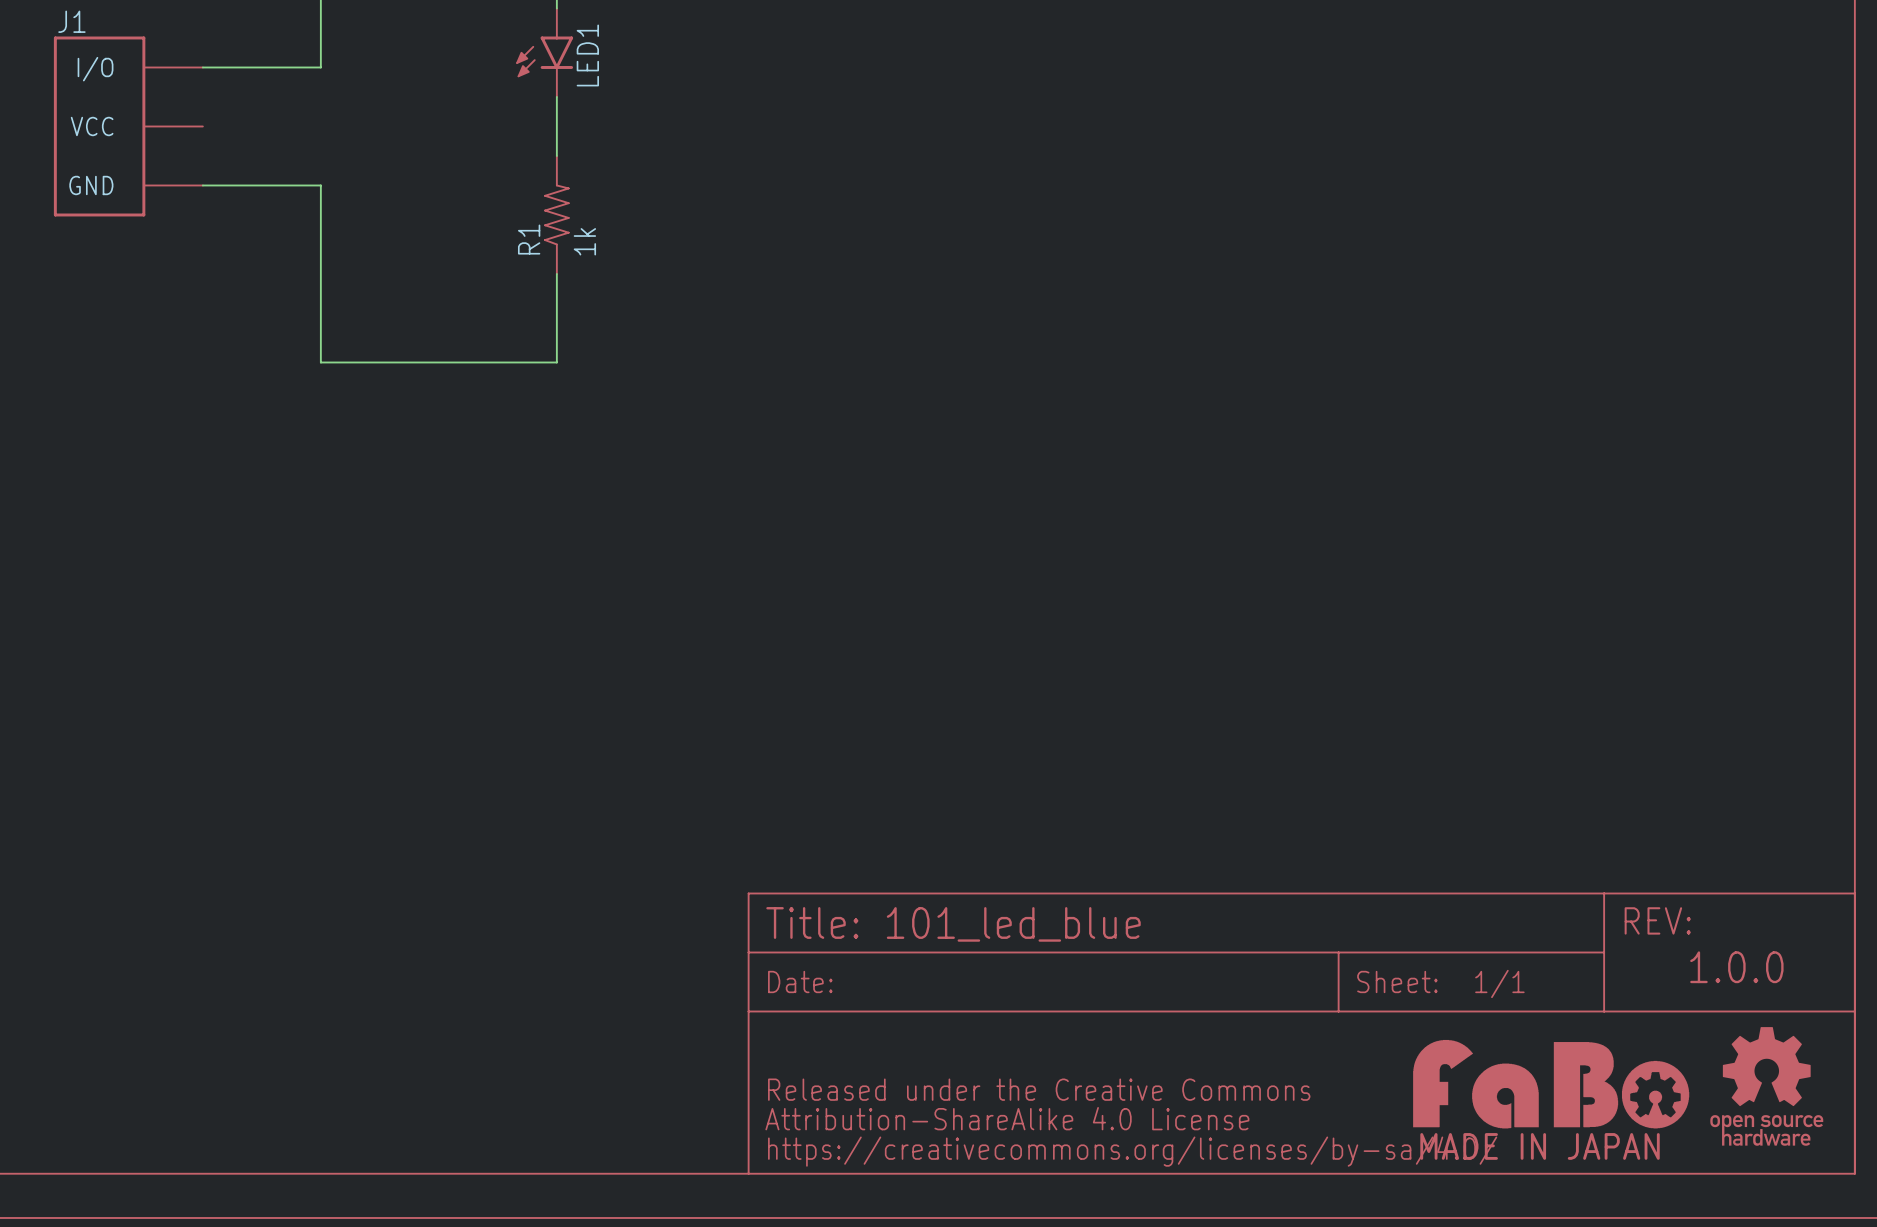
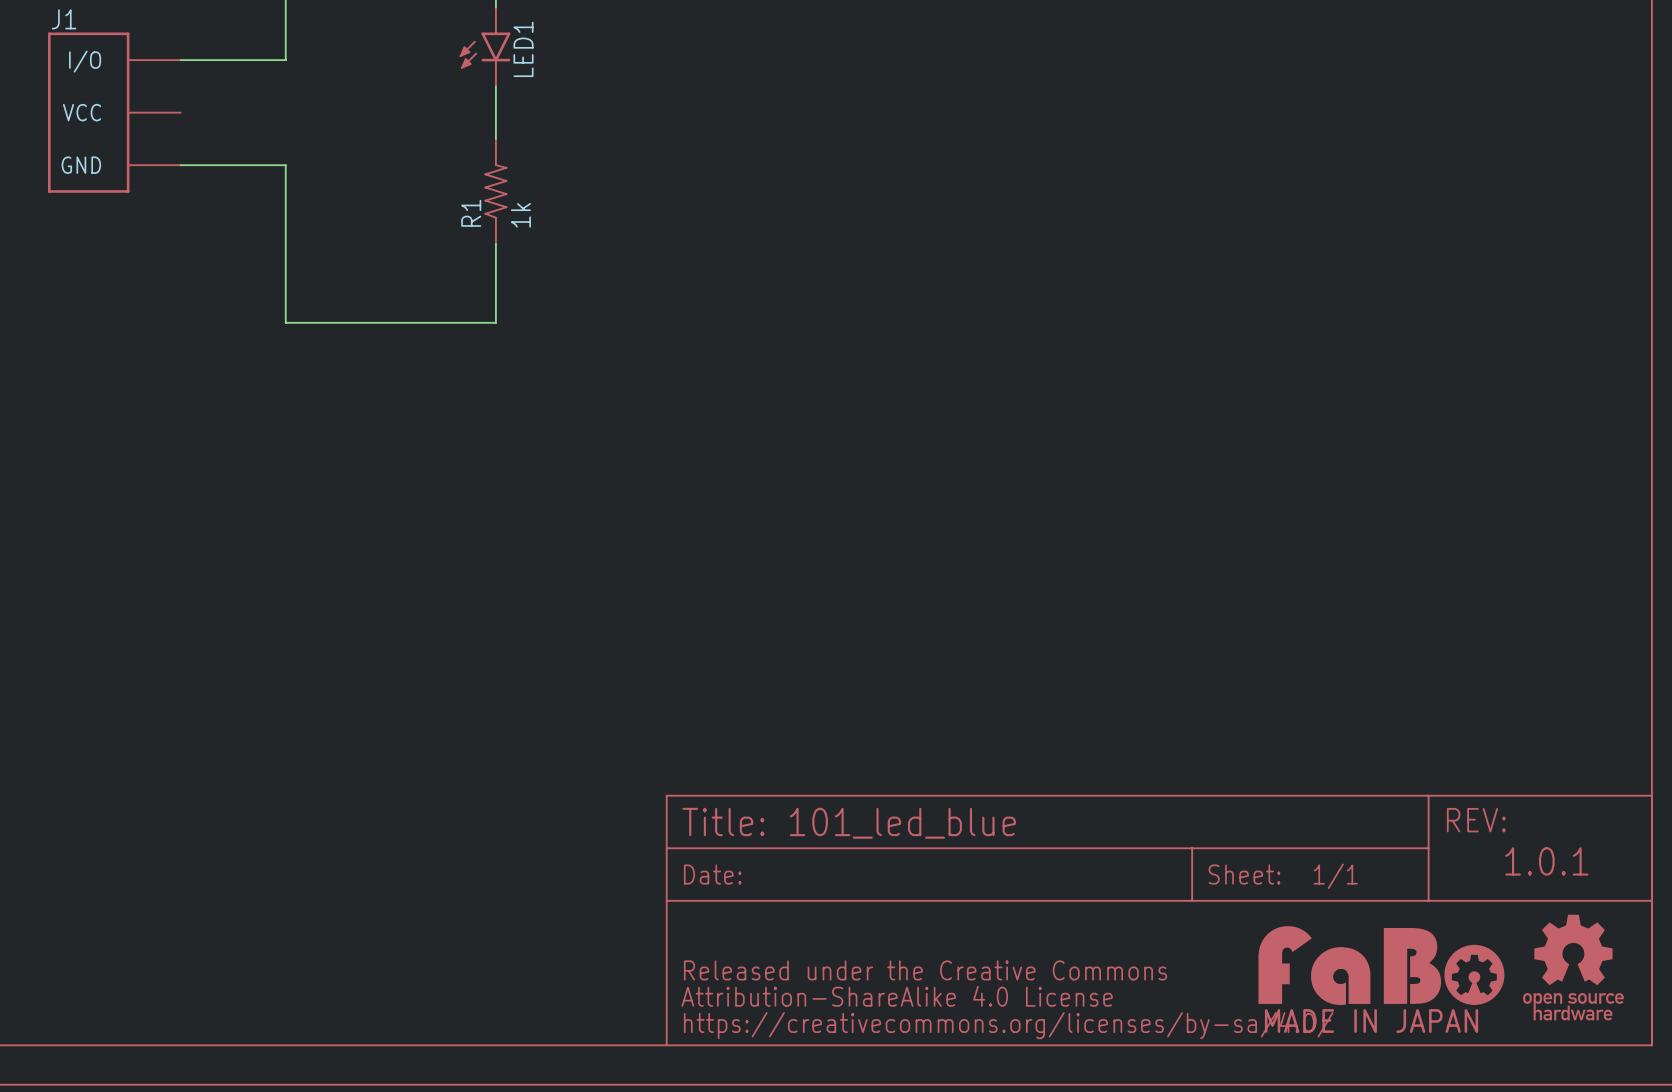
text: 1.0.0 (1736, 967) -> 1.0.1 (1546, 861)

